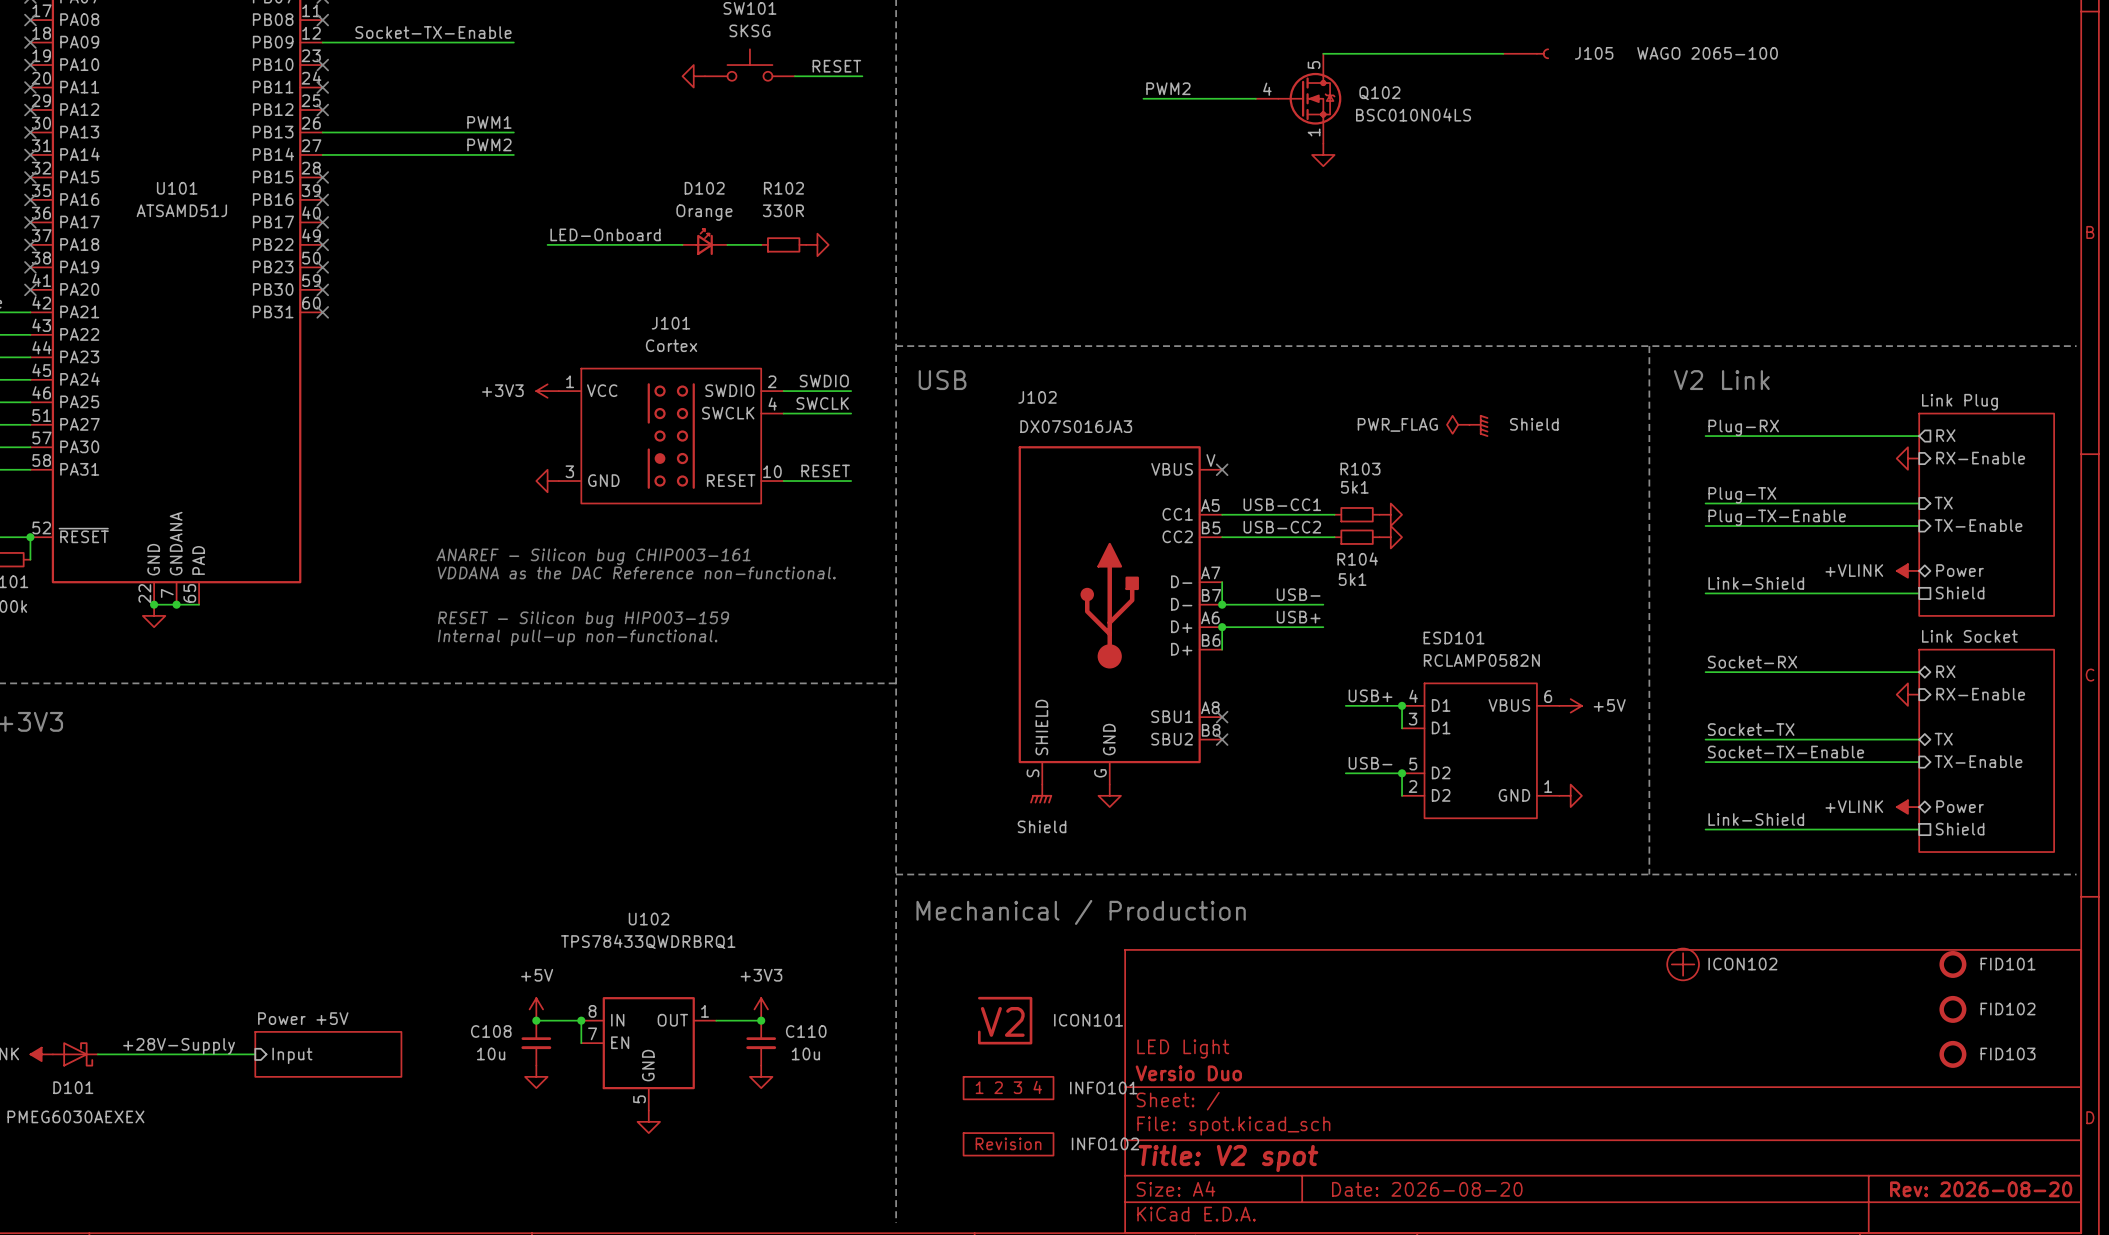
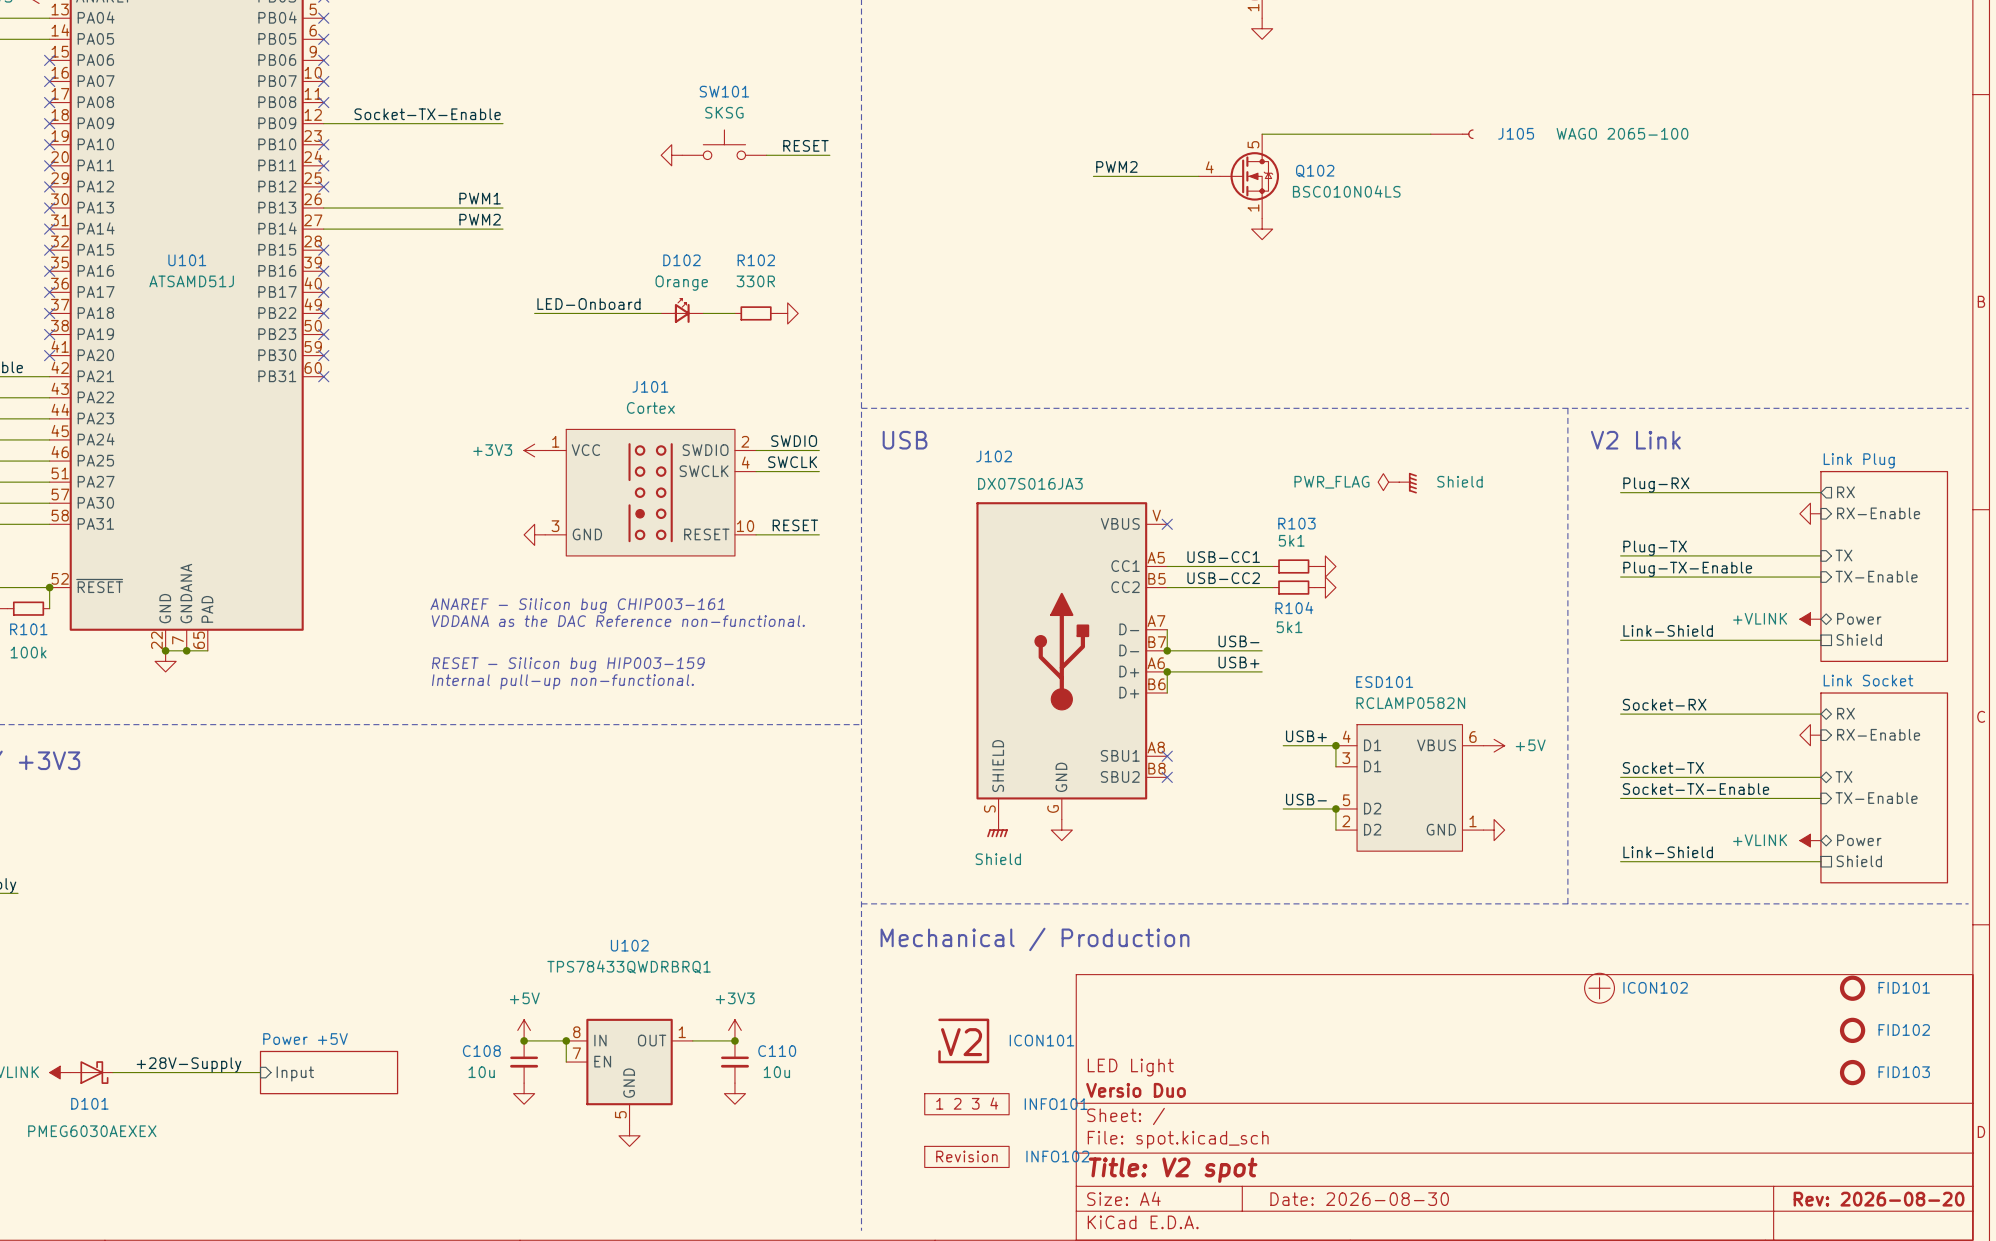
title block: Date: 2026-08-20 (1427, 1189) -> Date: 2026-08-30 (1359, 1199)

